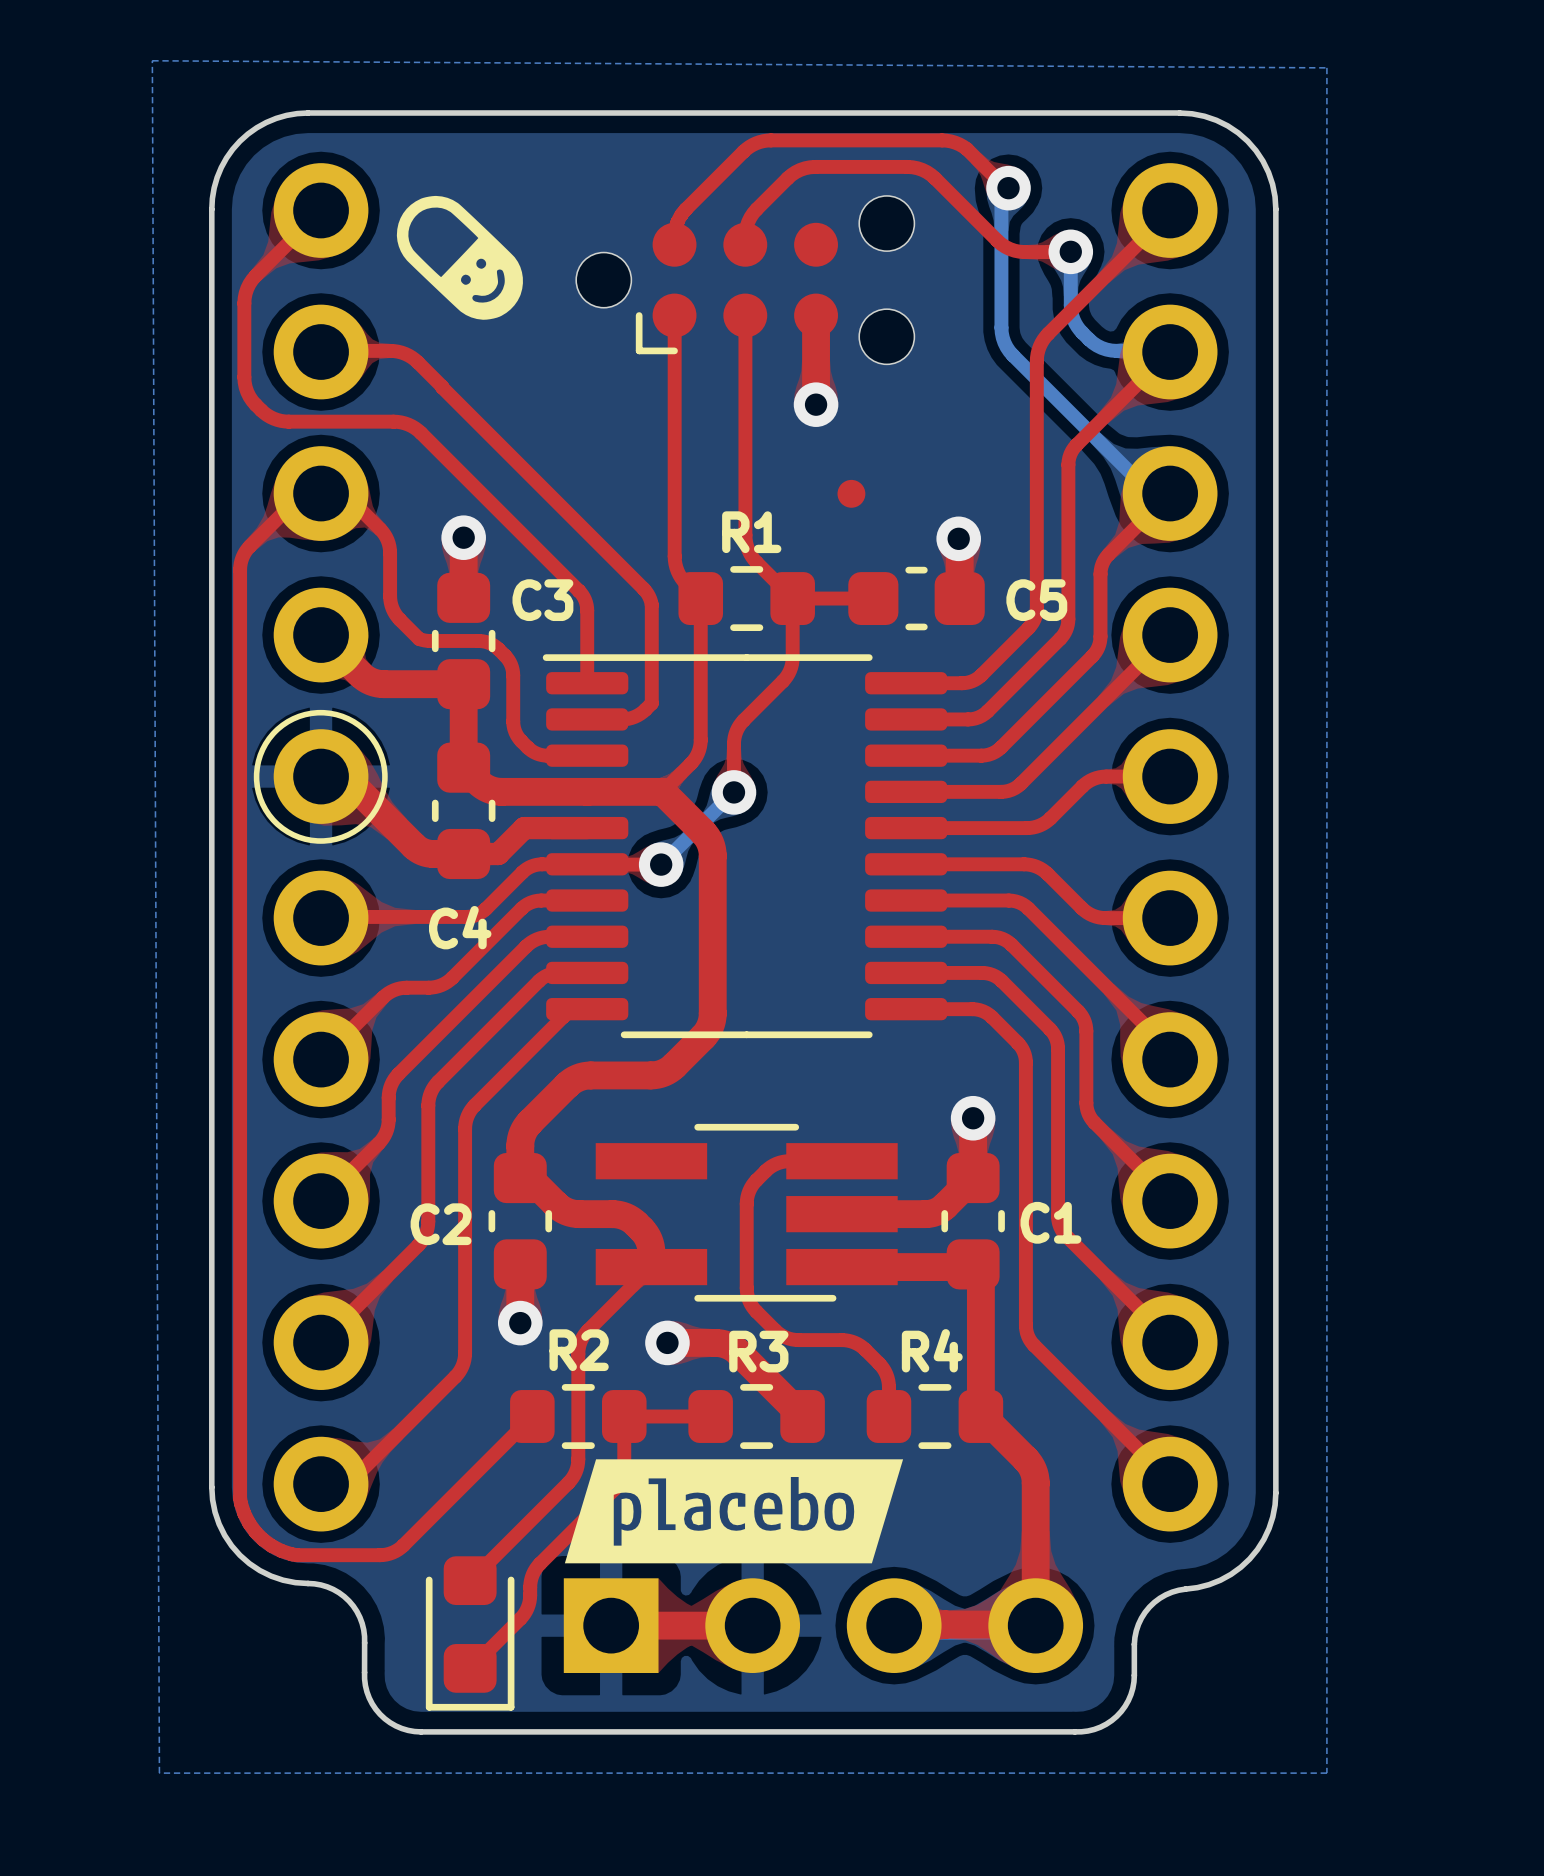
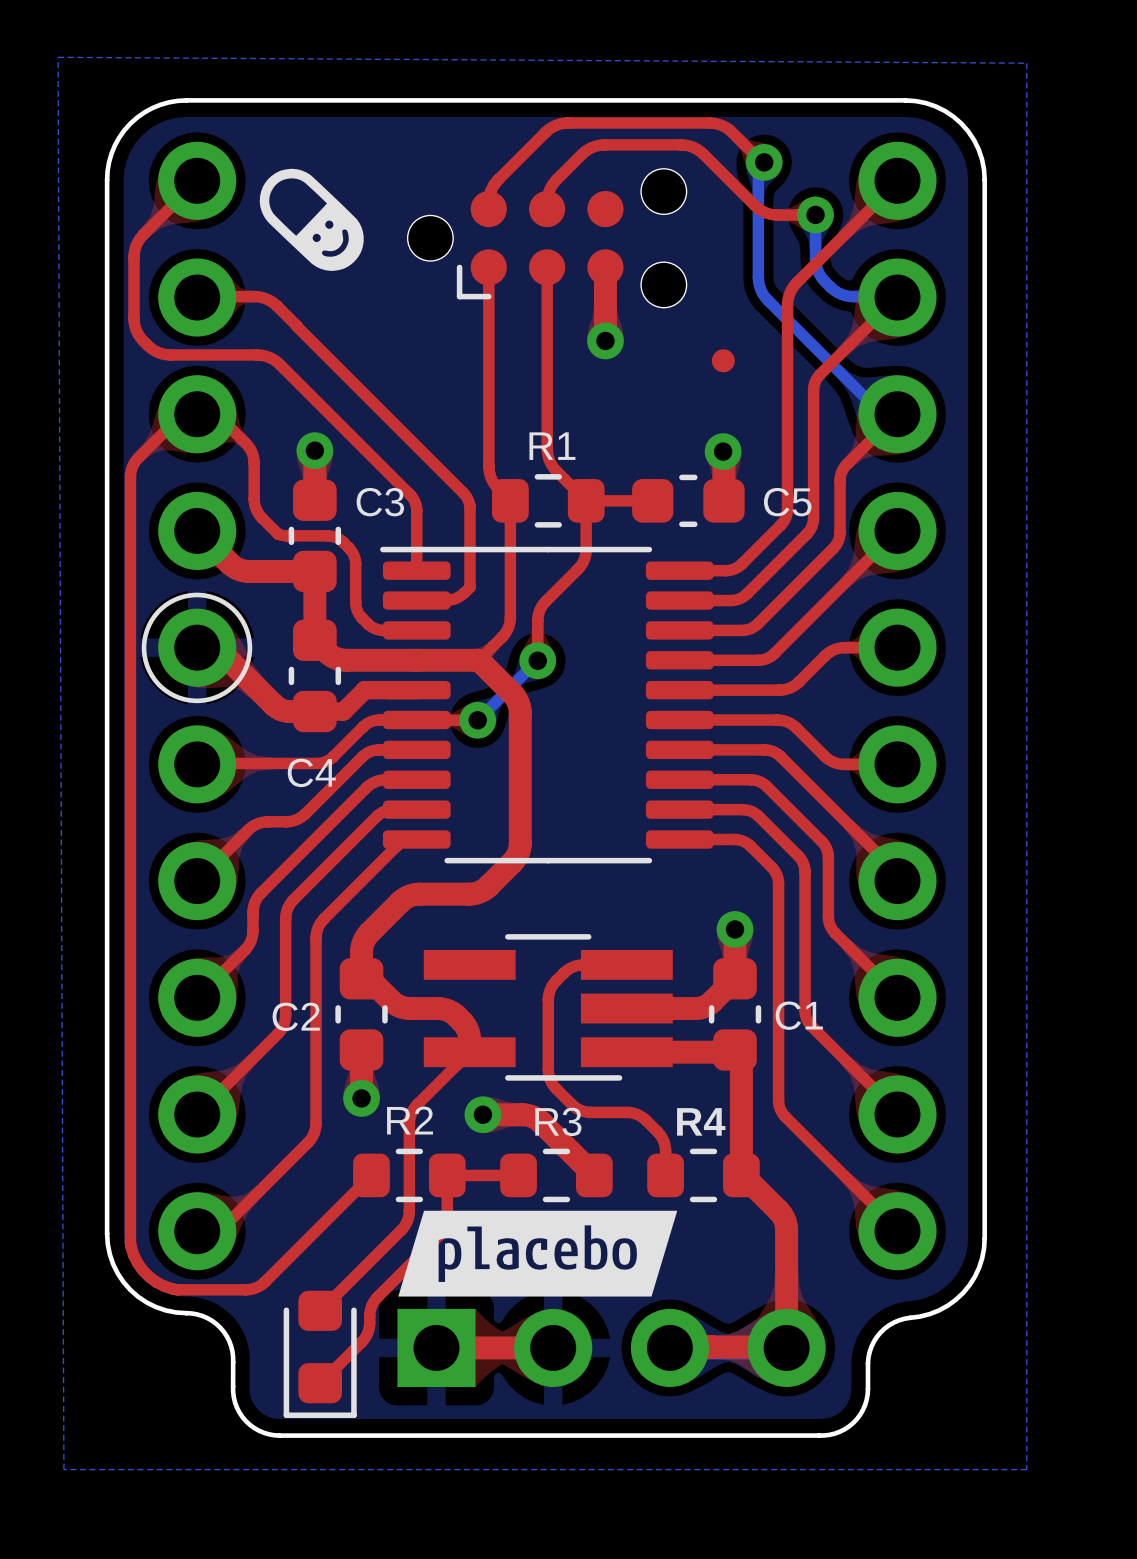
part position: (851, 493) -> (723, 360)

